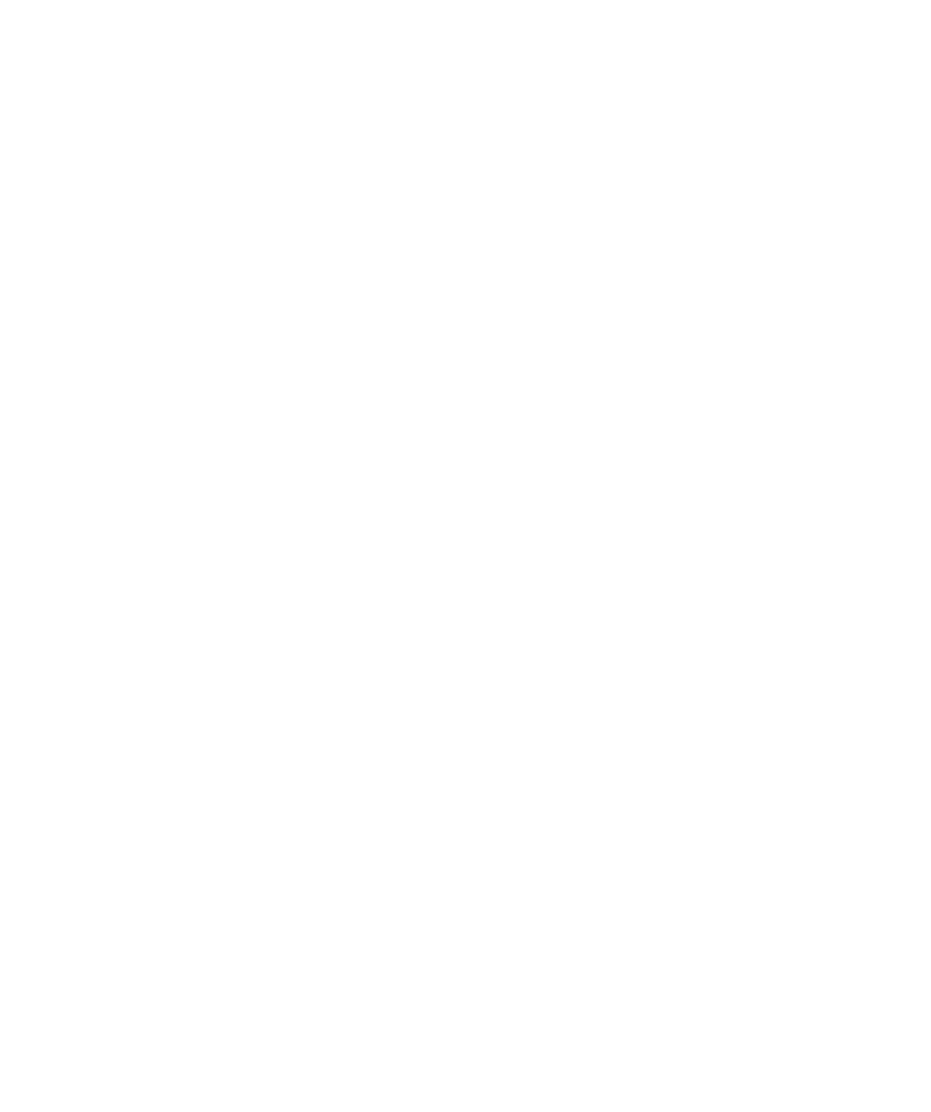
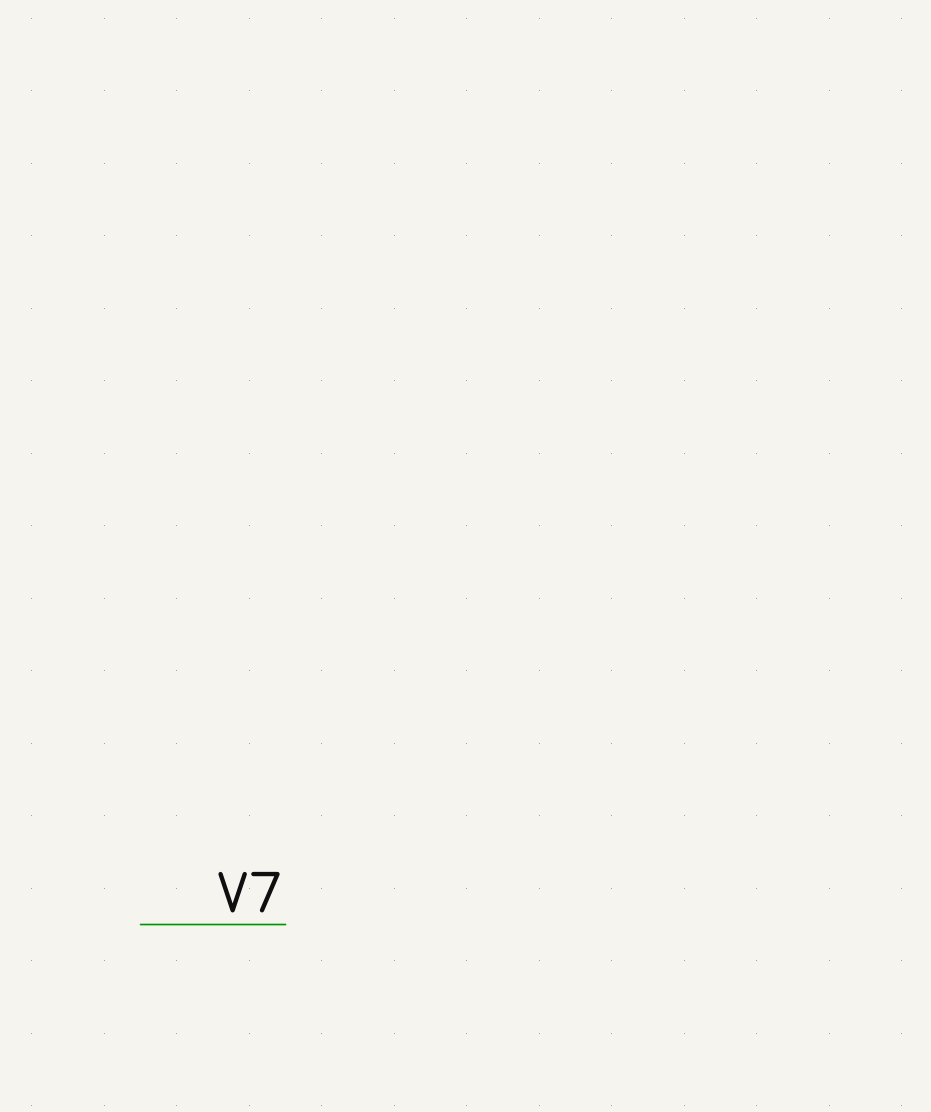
label: none -> V7 (249, 892)
wire: none -> (140, 924) (285, 924)

